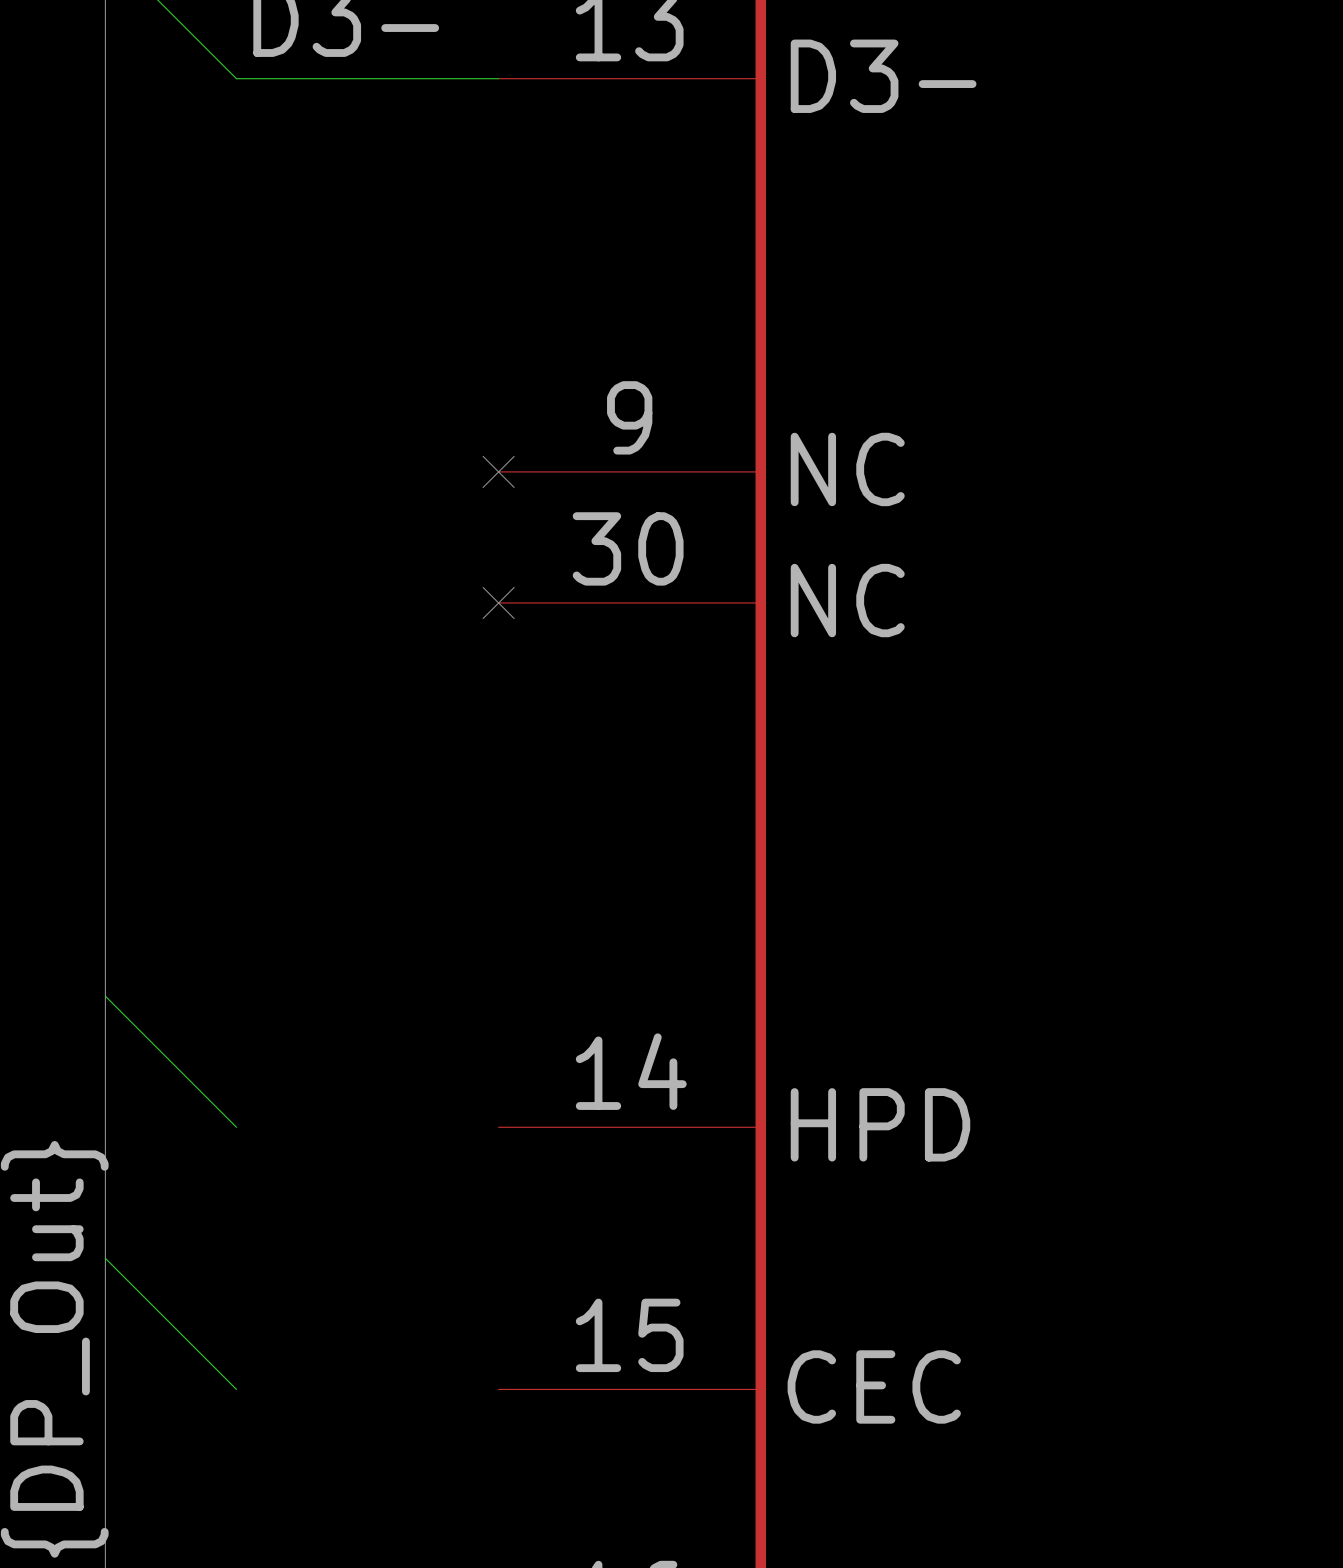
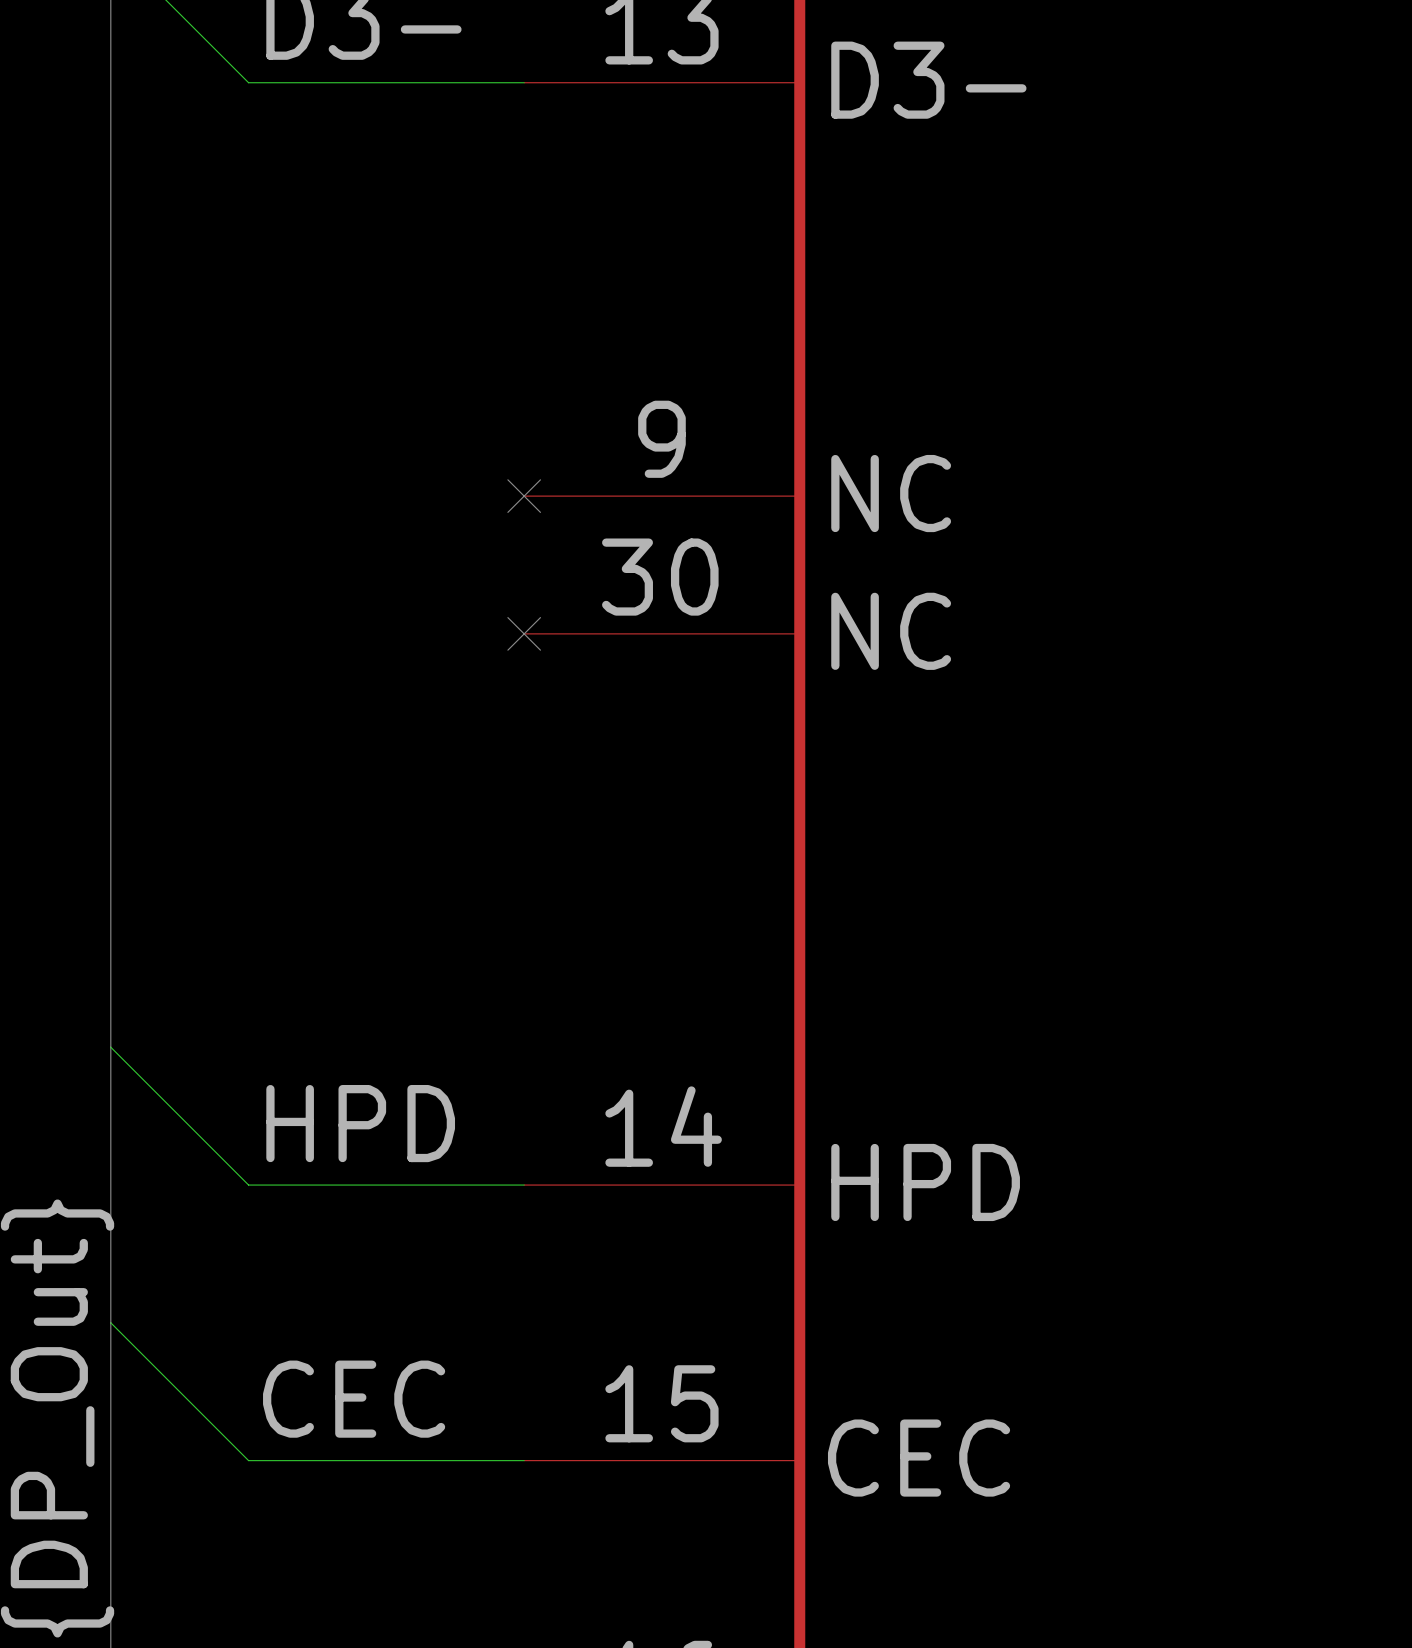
label: none -> HPD (360, 1123)
wire: none -> (248, 1185) (524, 1185)
label: none -> CEC (354, 1399)
wire: none -> (248, 1460) (524, 1460)

